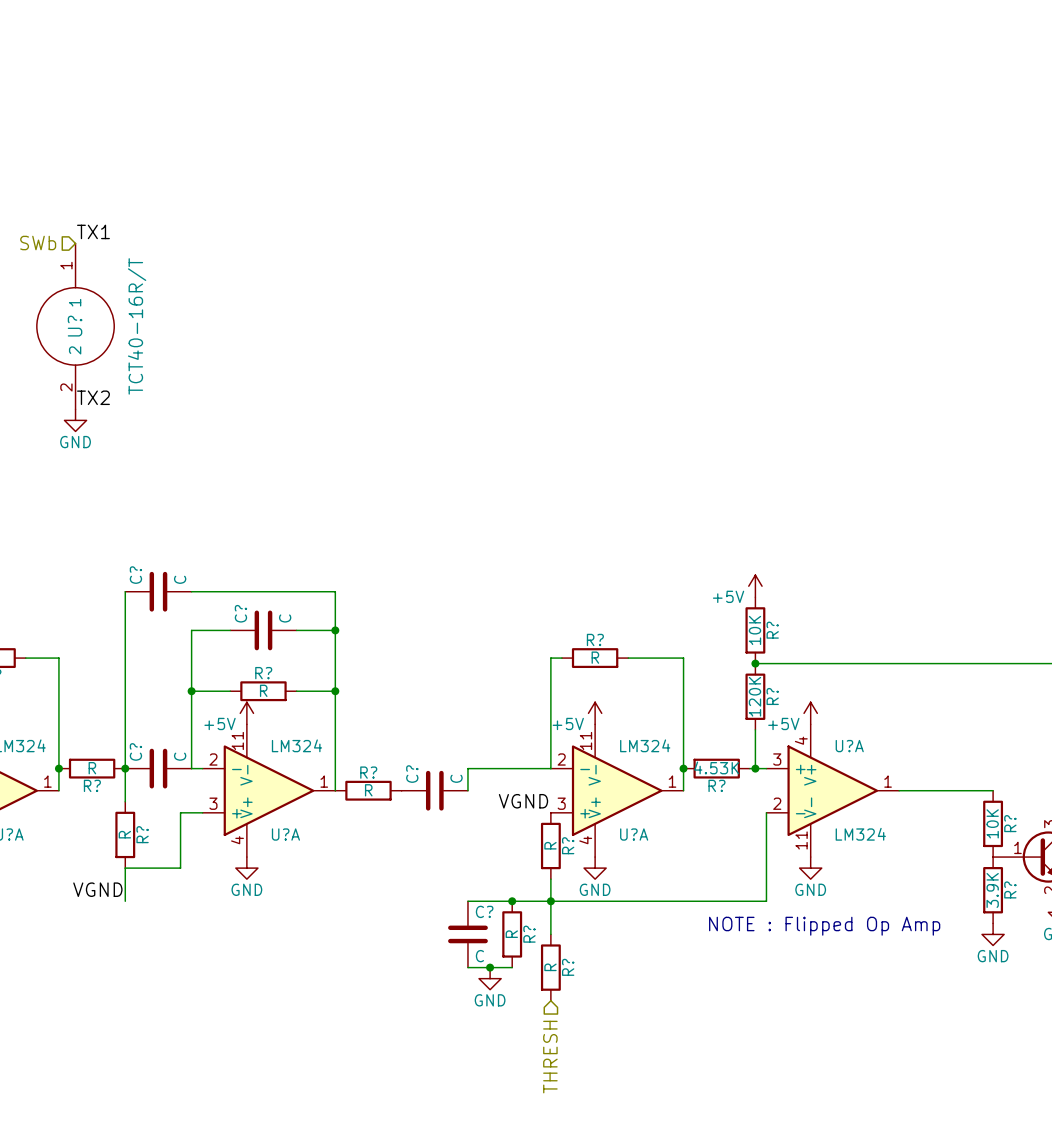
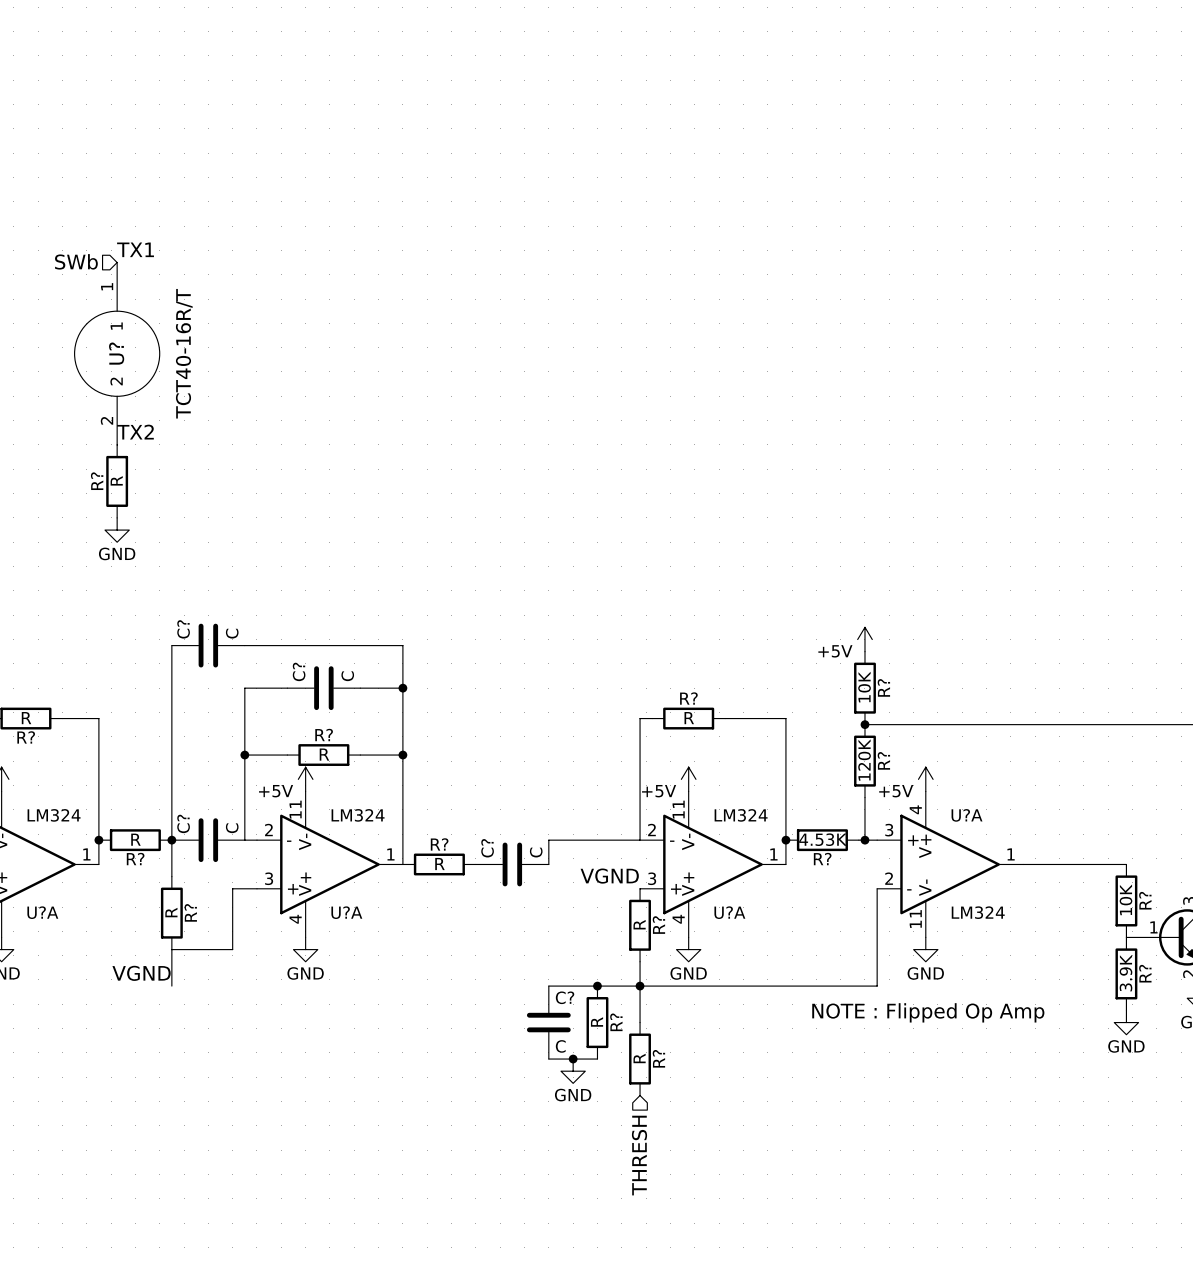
power symbol position: GND (75, 420) -> GND (117, 530)
R?: none -> R (117, 481)

